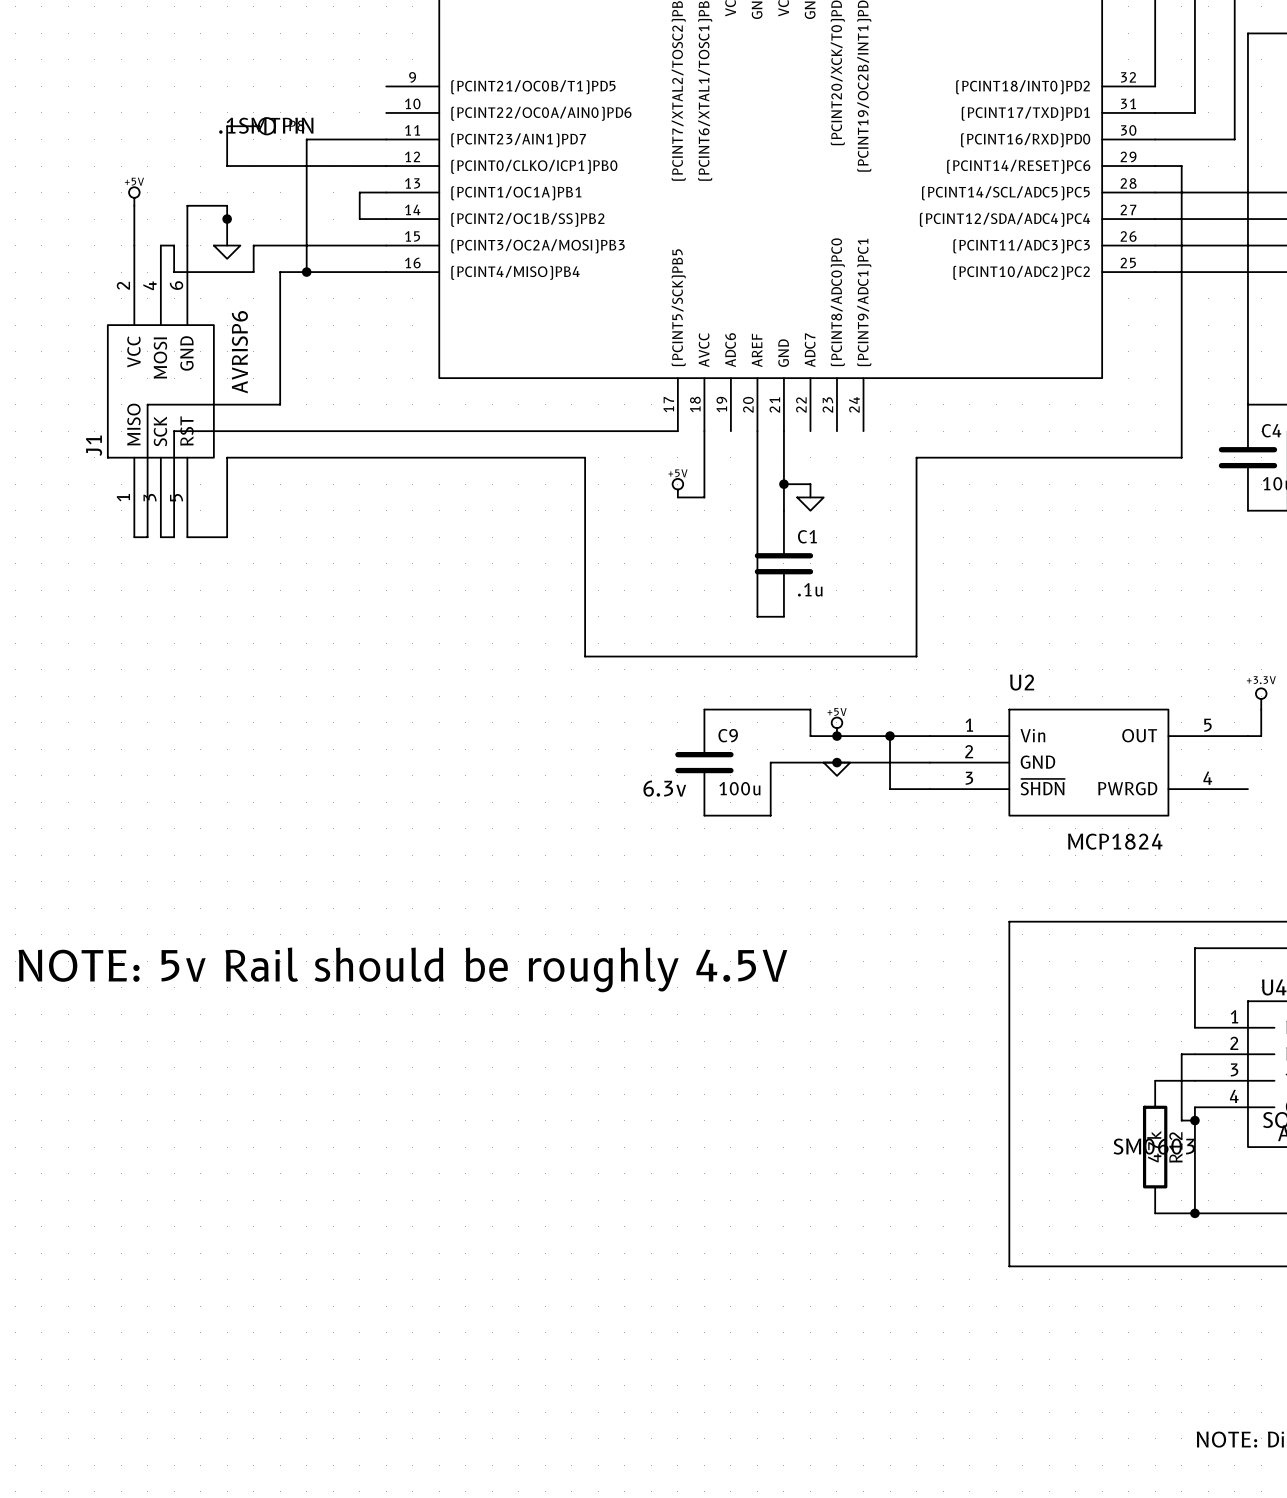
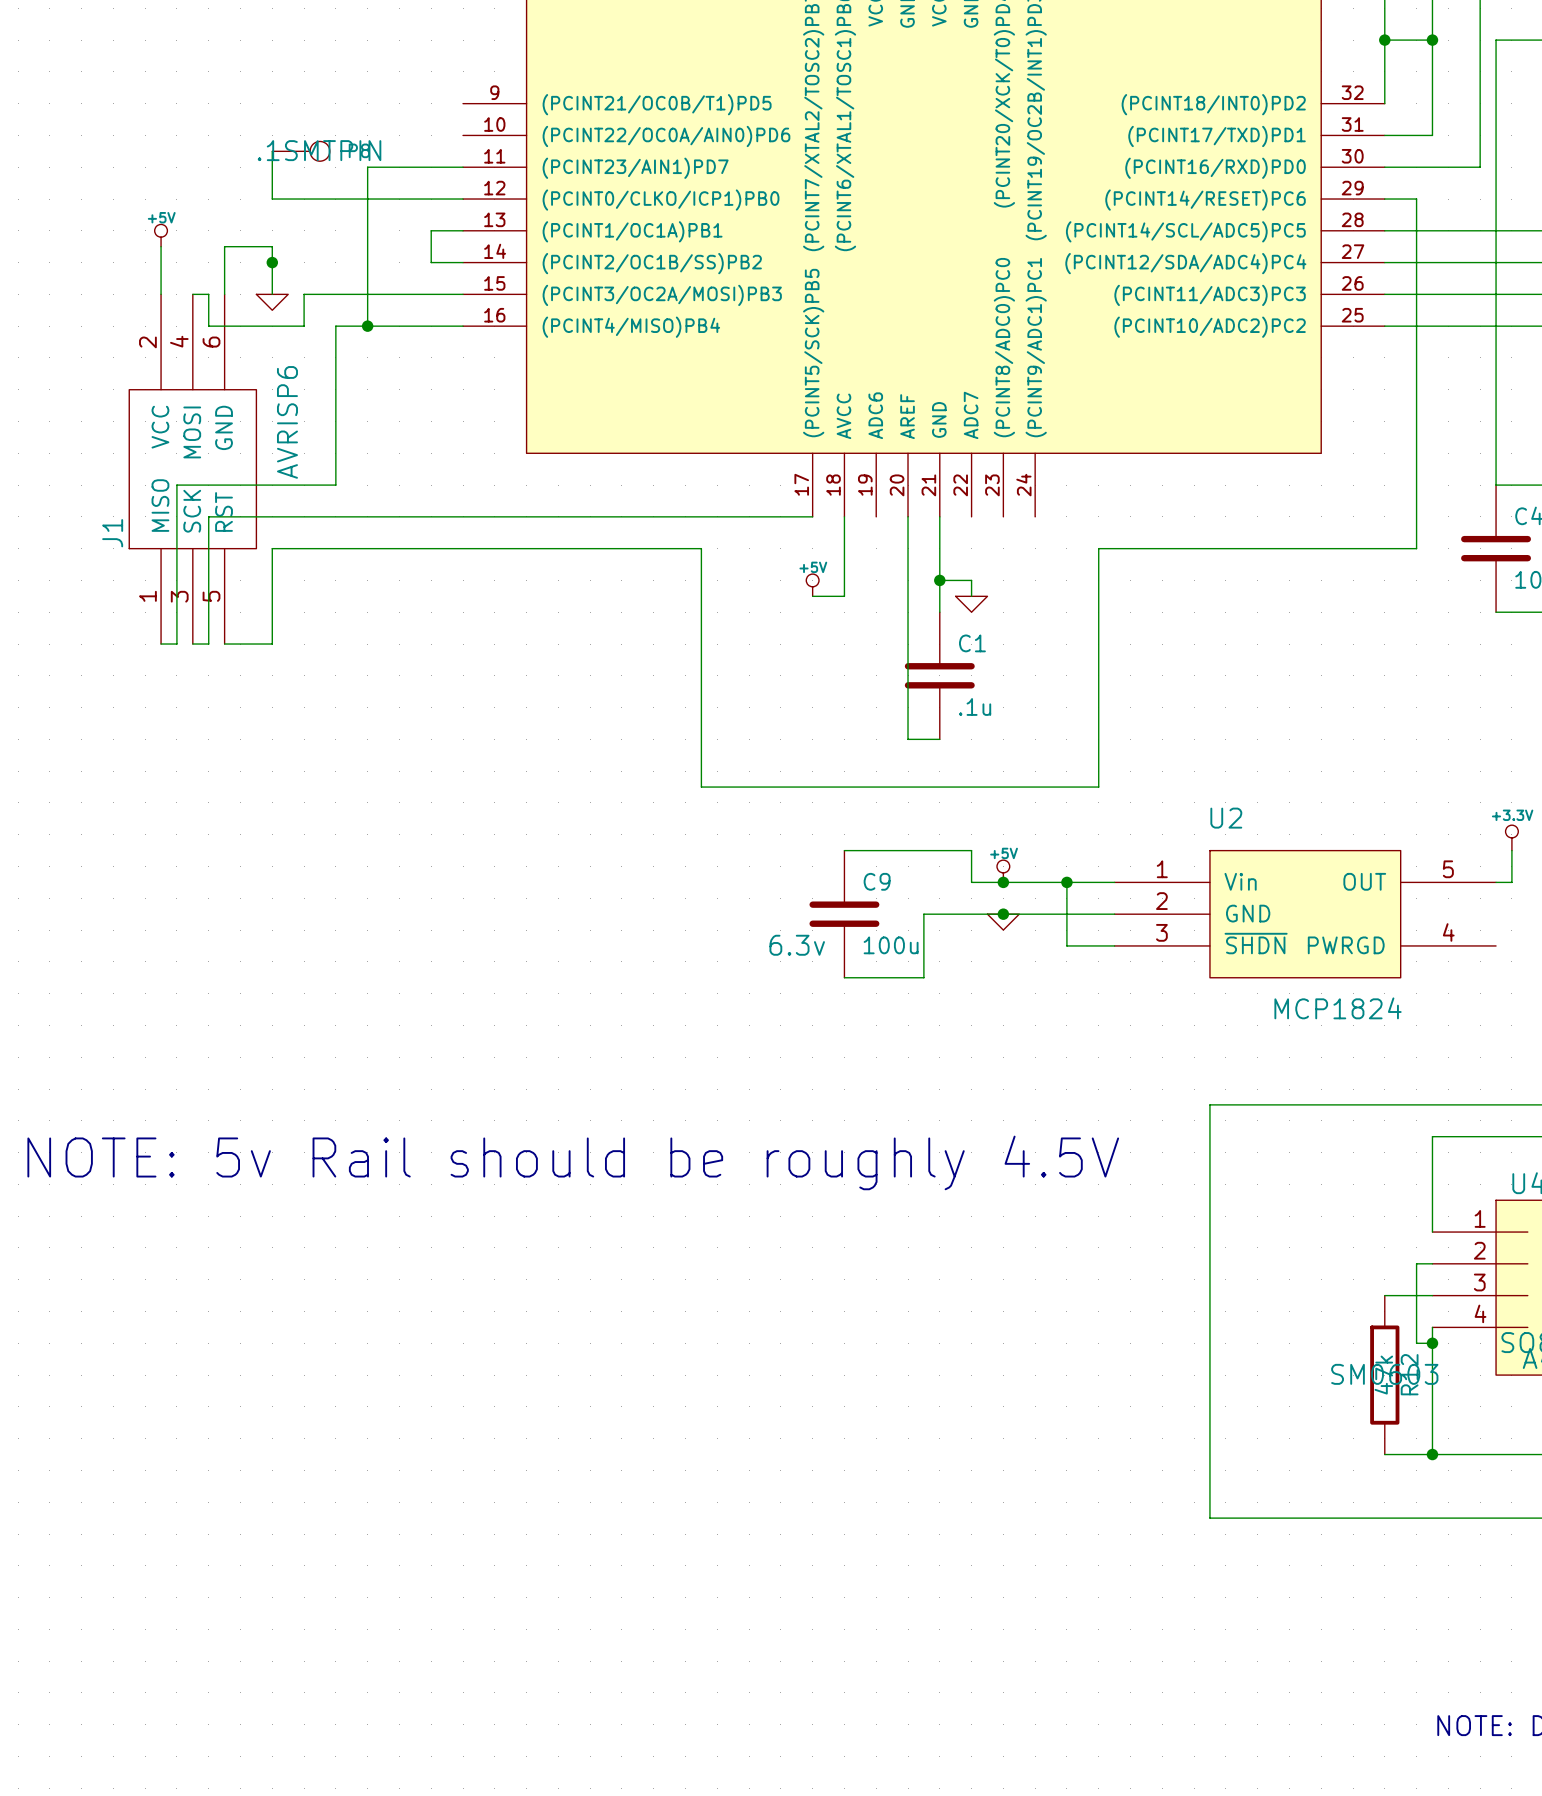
wire: none -> (1384, 40) (1432, 40)
junction: none -> (1384, 40)
junction: none -> (1432, 40)

